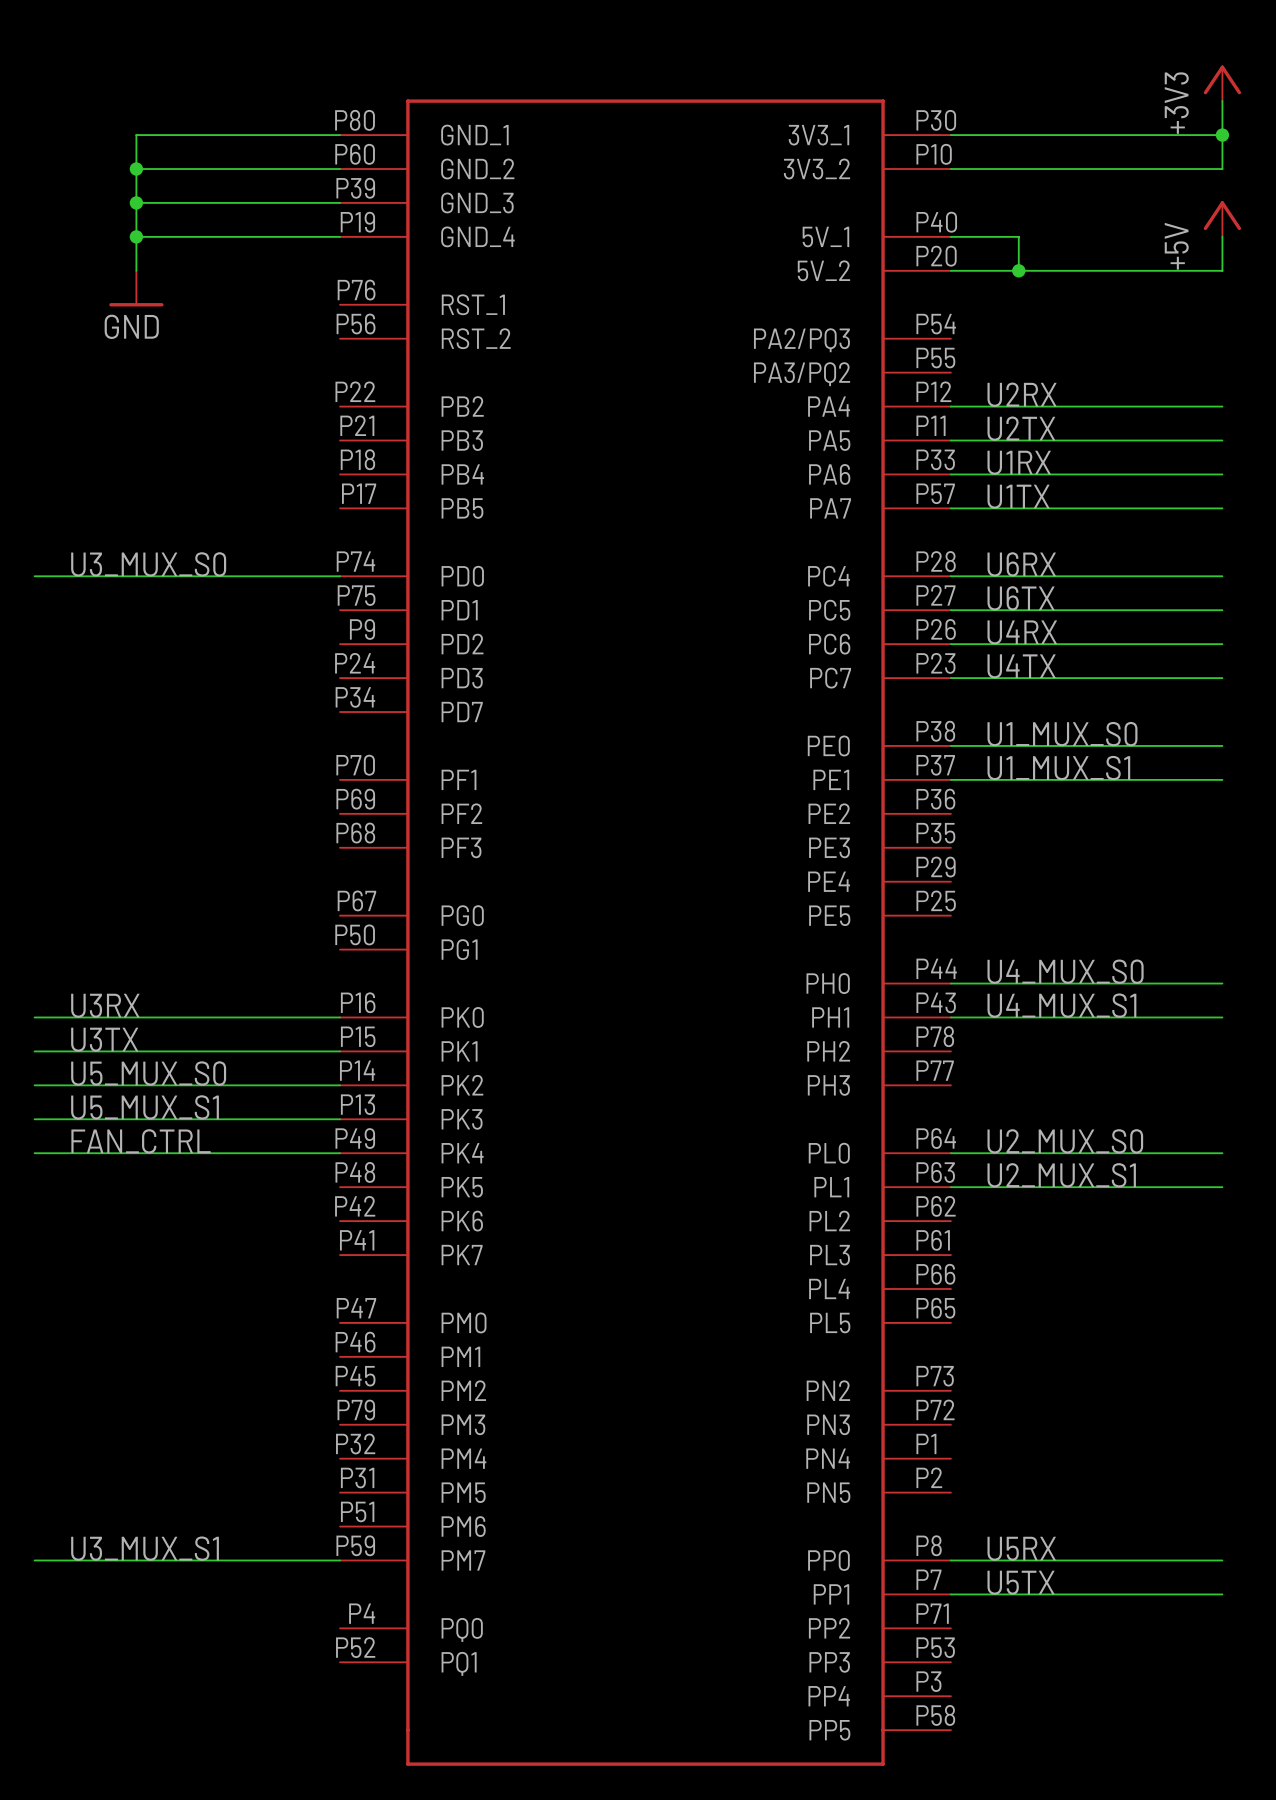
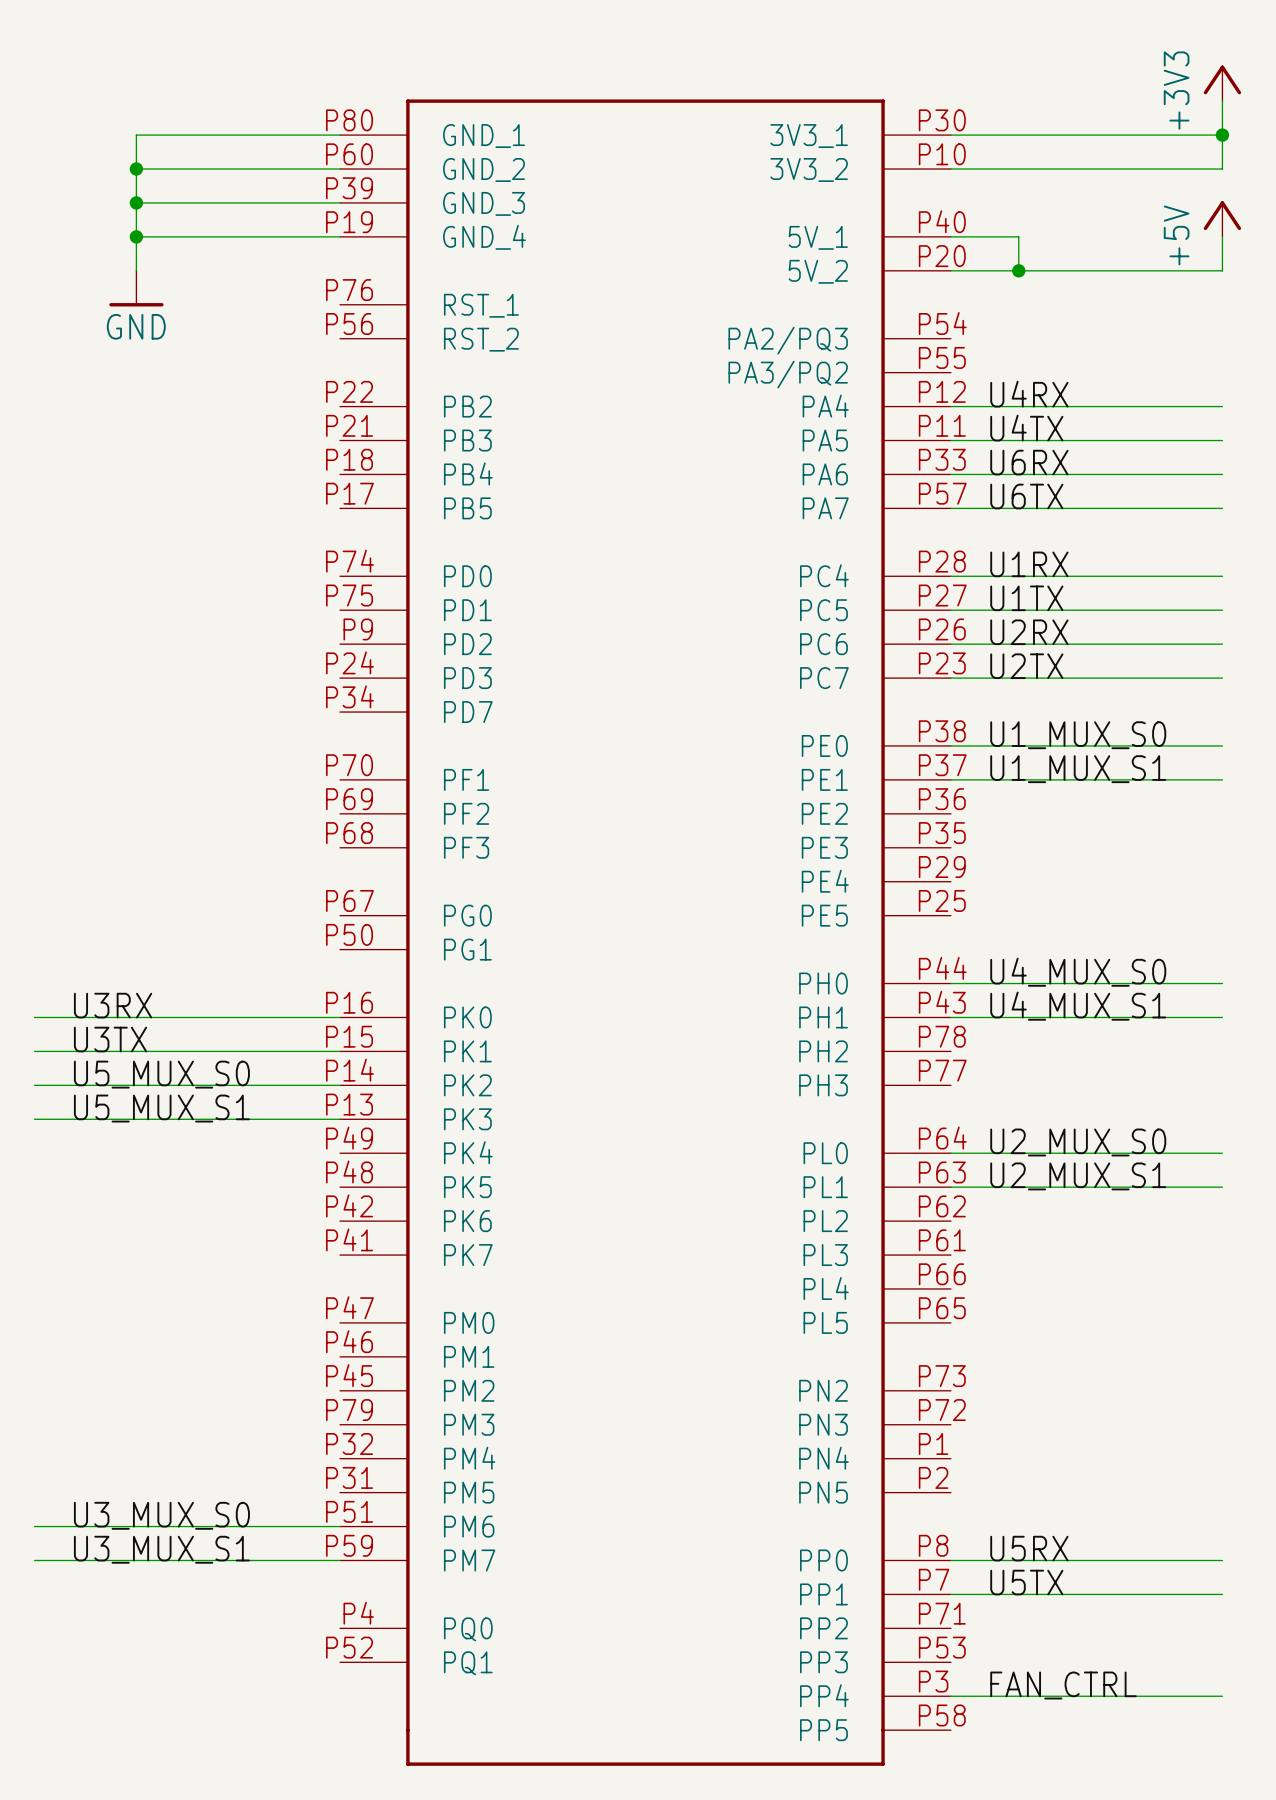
label: U2RX (1022, 394) -> U4RX (1029, 394)
label: U2TX (1021, 428) -> U4TX (1026, 428)
label: U1RX (1019, 462) -> U6RX (1029, 462)
label: U1TX (1018, 496) -> U6TX (1026, 496)
label: U3_MUX_S0 (148, 564) -> none
label: U6RX (1021, 564) -> U1RX (1029, 564)
wire: (34, 576) (340, 576) -> none
label: U6TX (1021, 598) -> U1TX (1026, 598)
label: U4RX (1022, 632) -> U2RX (1029, 632)
label: U4TX (1021, 666) -> U2TX (1026, 666)
label: FAN_CTRL (141, 1141) -> none
wire: (34, 1153) (340, 1153) -> none
label: none -> U3_MUX_S0 (161, 1515)
wire: none -> (34, 1526) (340, 1526)
label: none -> FAN_CTRL (1063, 1685)
wire: none -> (950, 1696) (1222, 1696)

